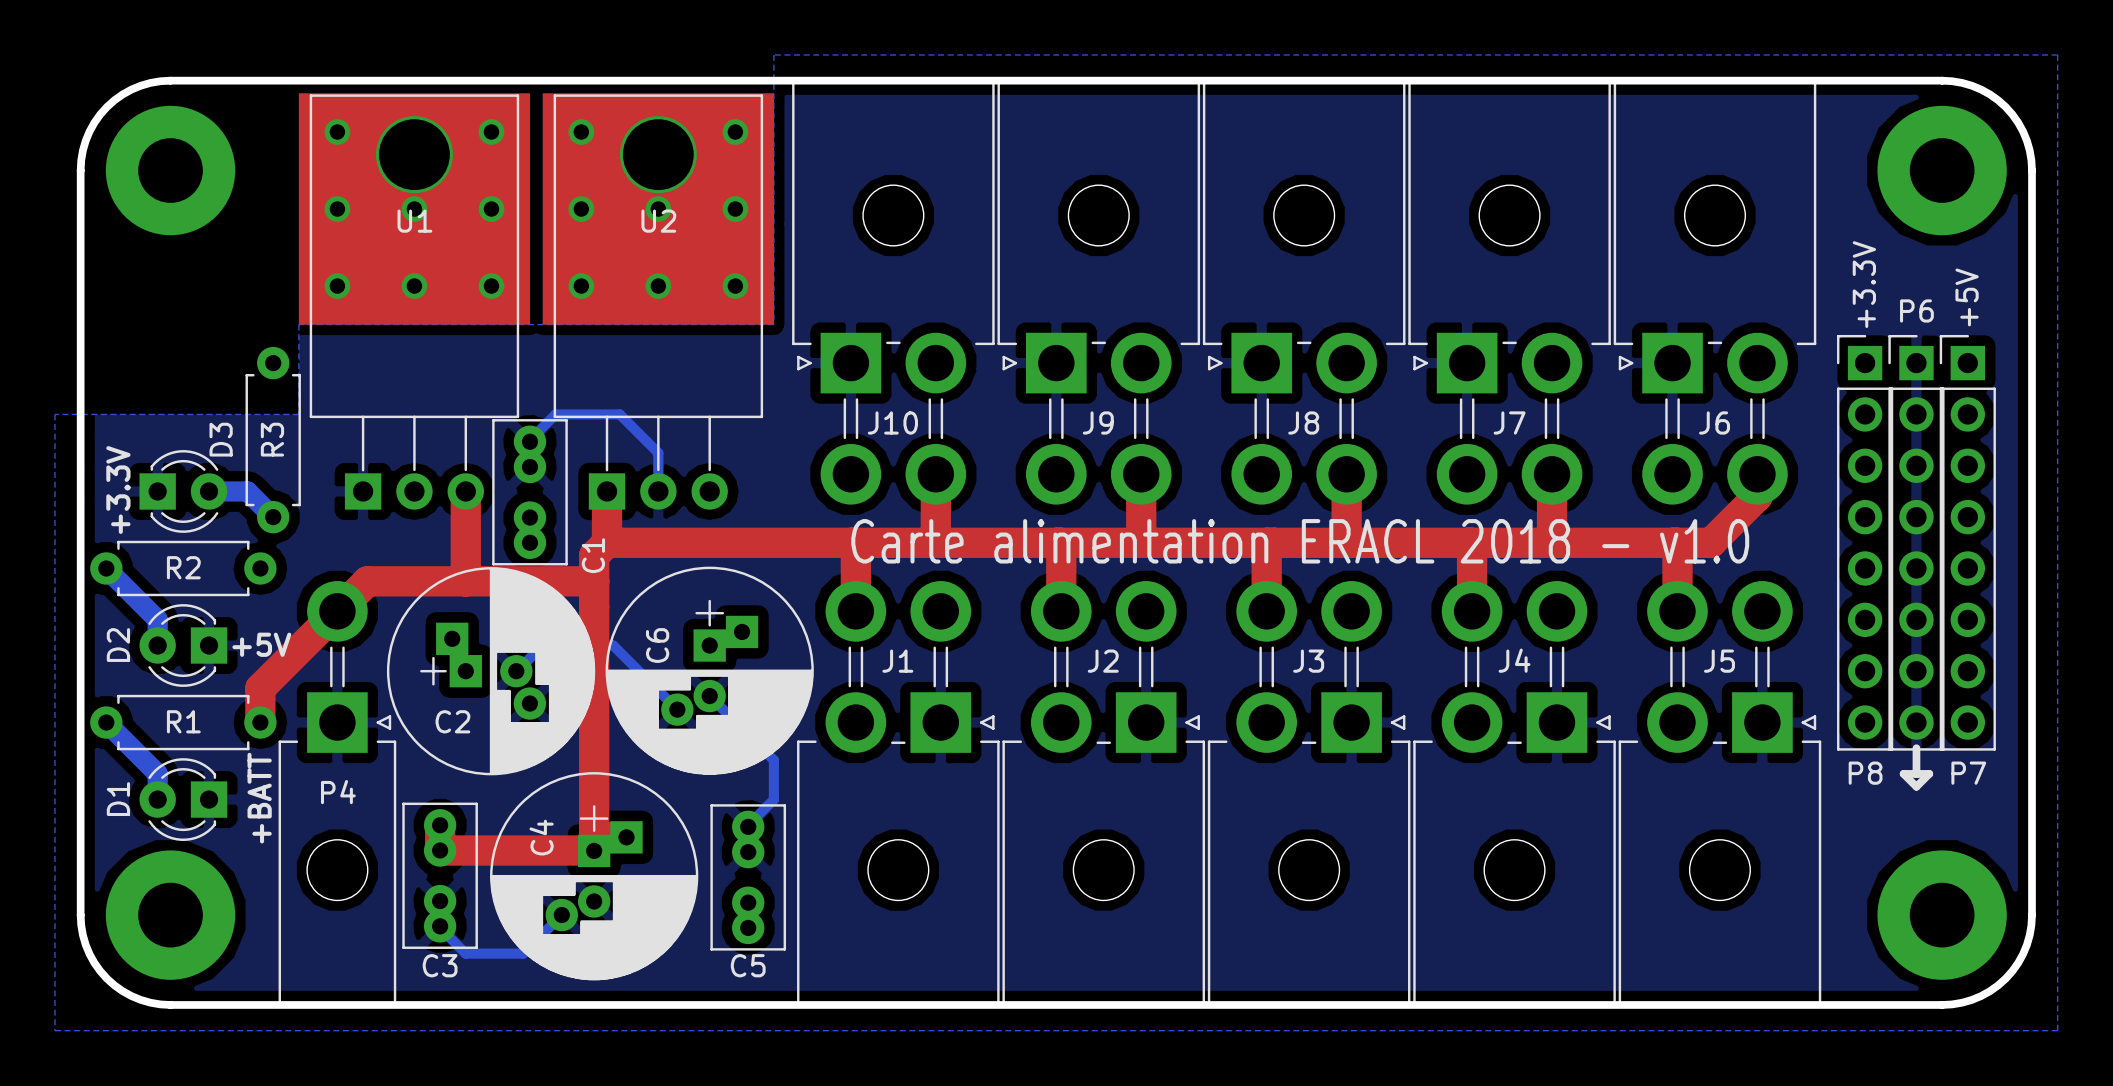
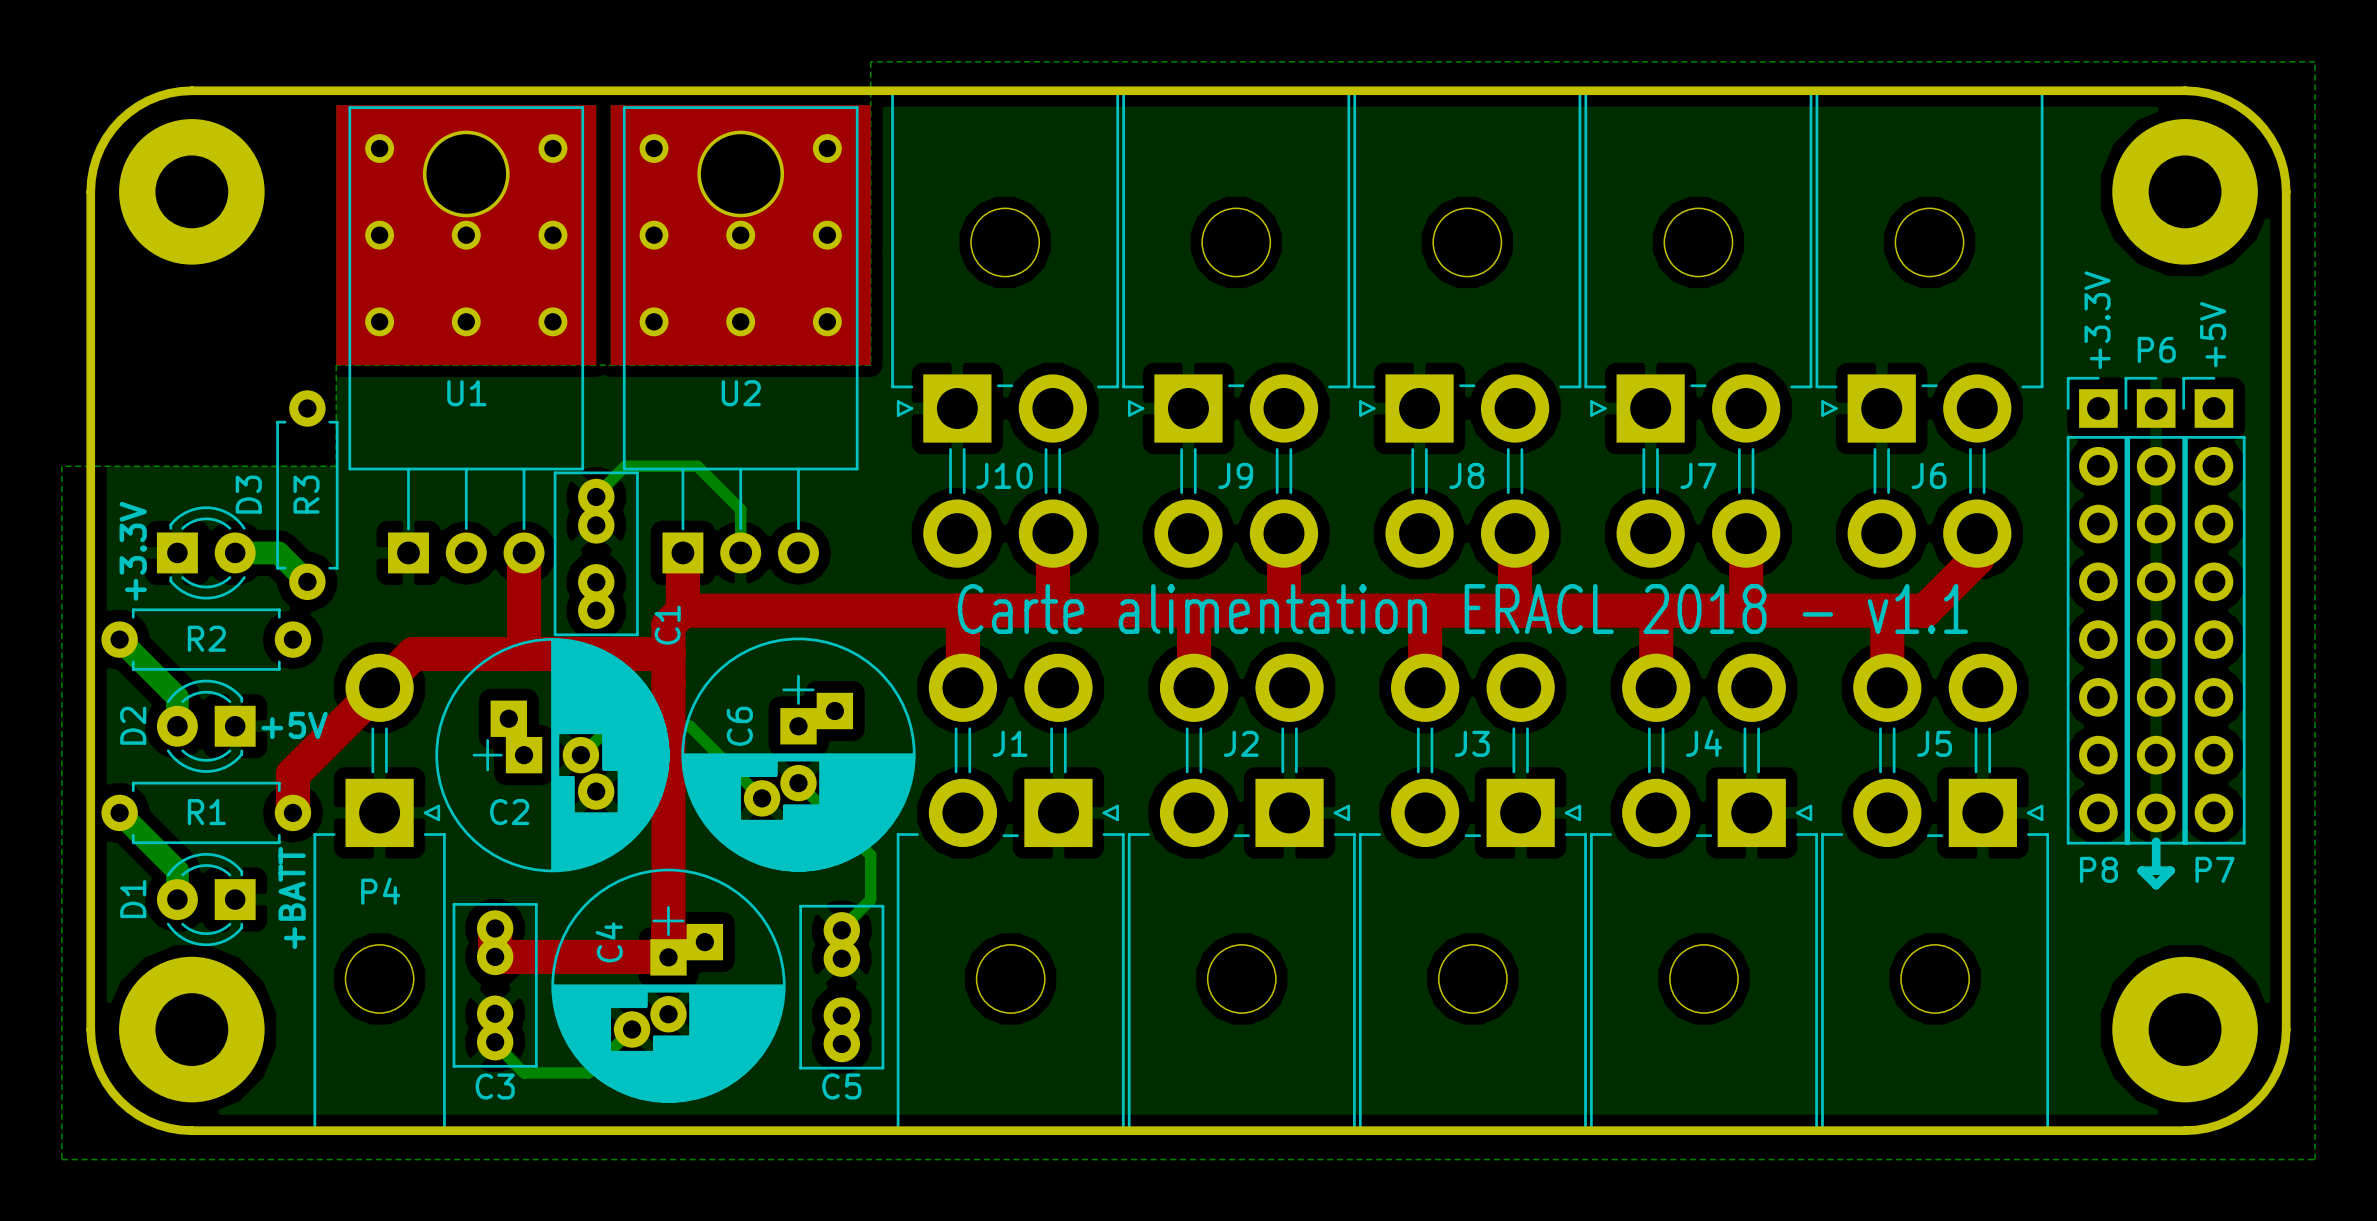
U1 name position: U1 (414, 221) -> U1 (466, 393)
U2 name position: U2 (658, 221) -> U2 (741, 393)
text: Carte alimentation ERACL 2018 - v1.0 (1300, 541) -> Carte alimentation ERACL 2018 - v1.1 (1462, 609)

